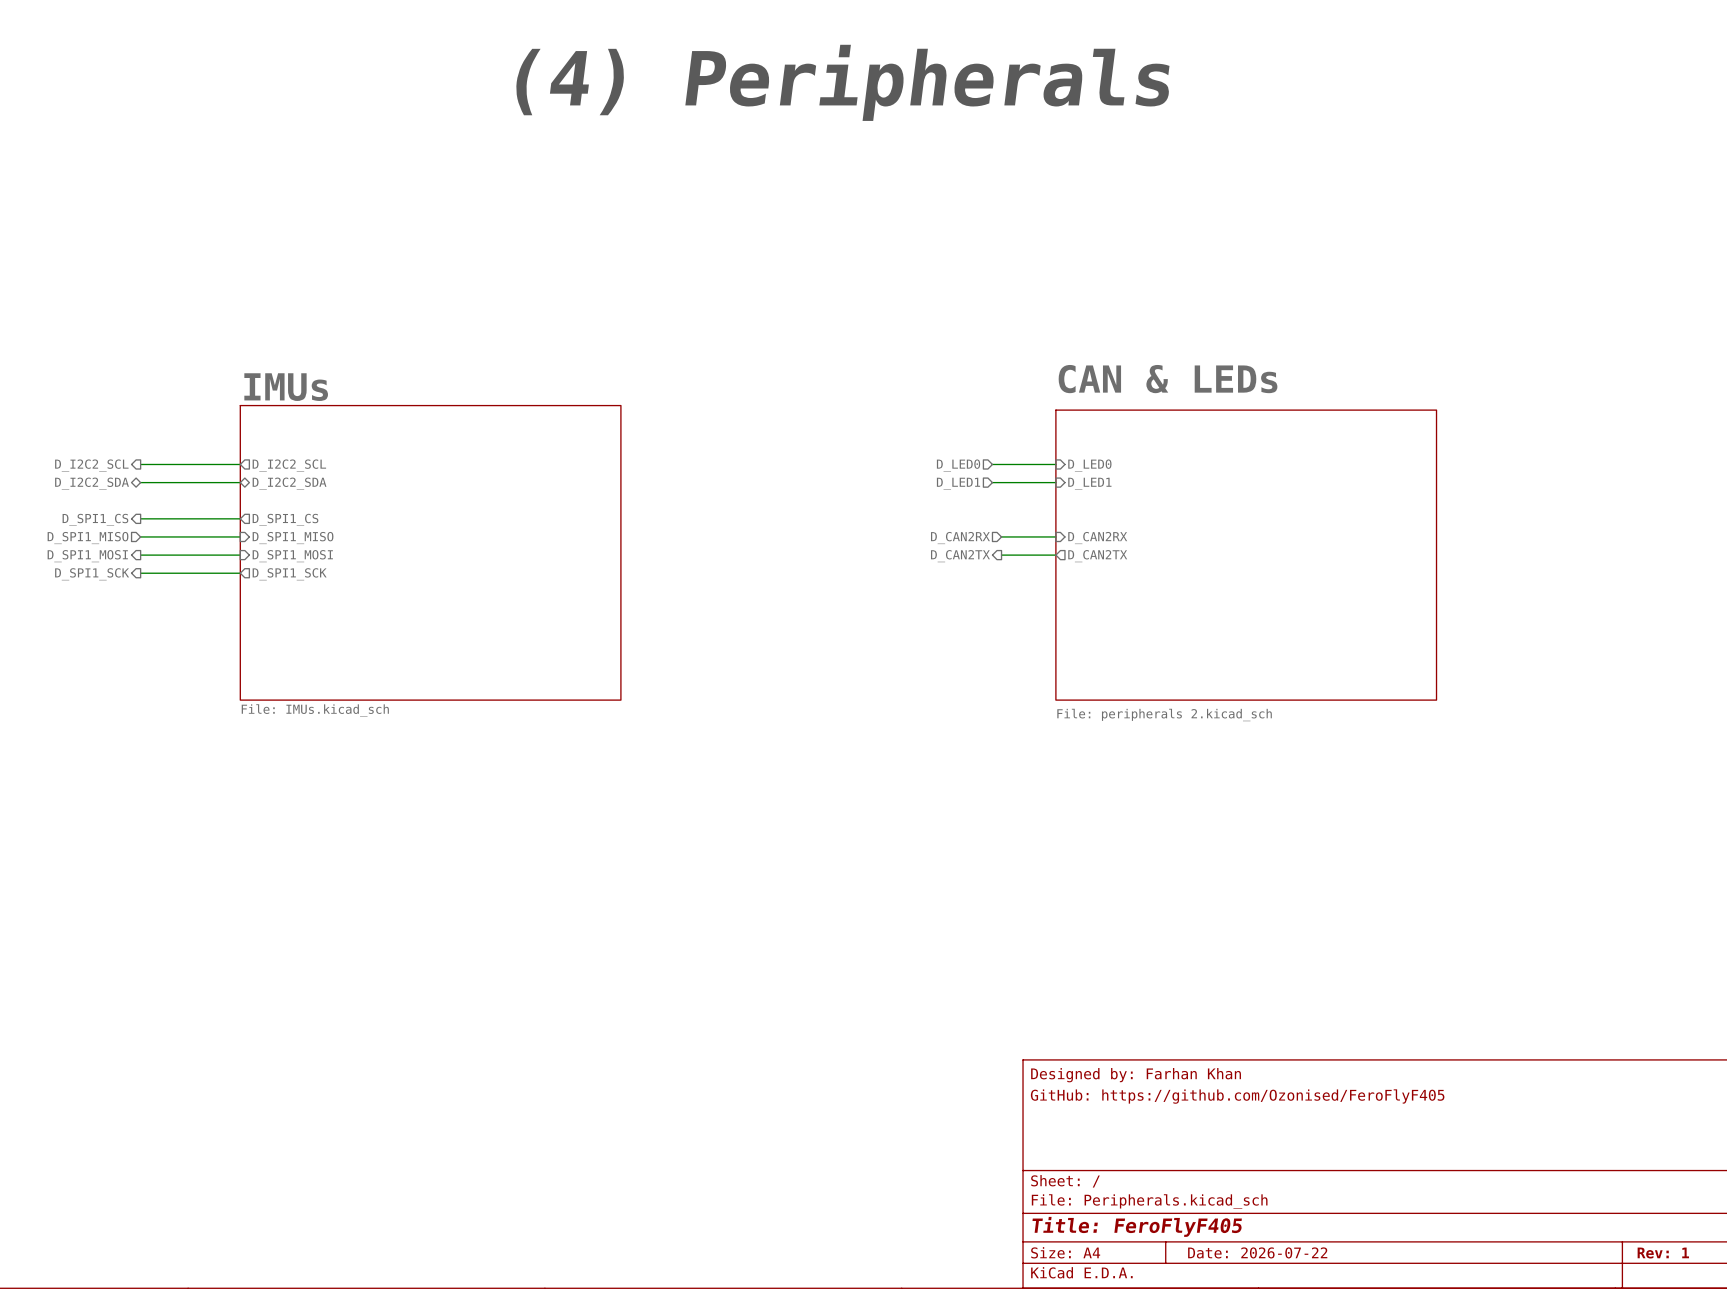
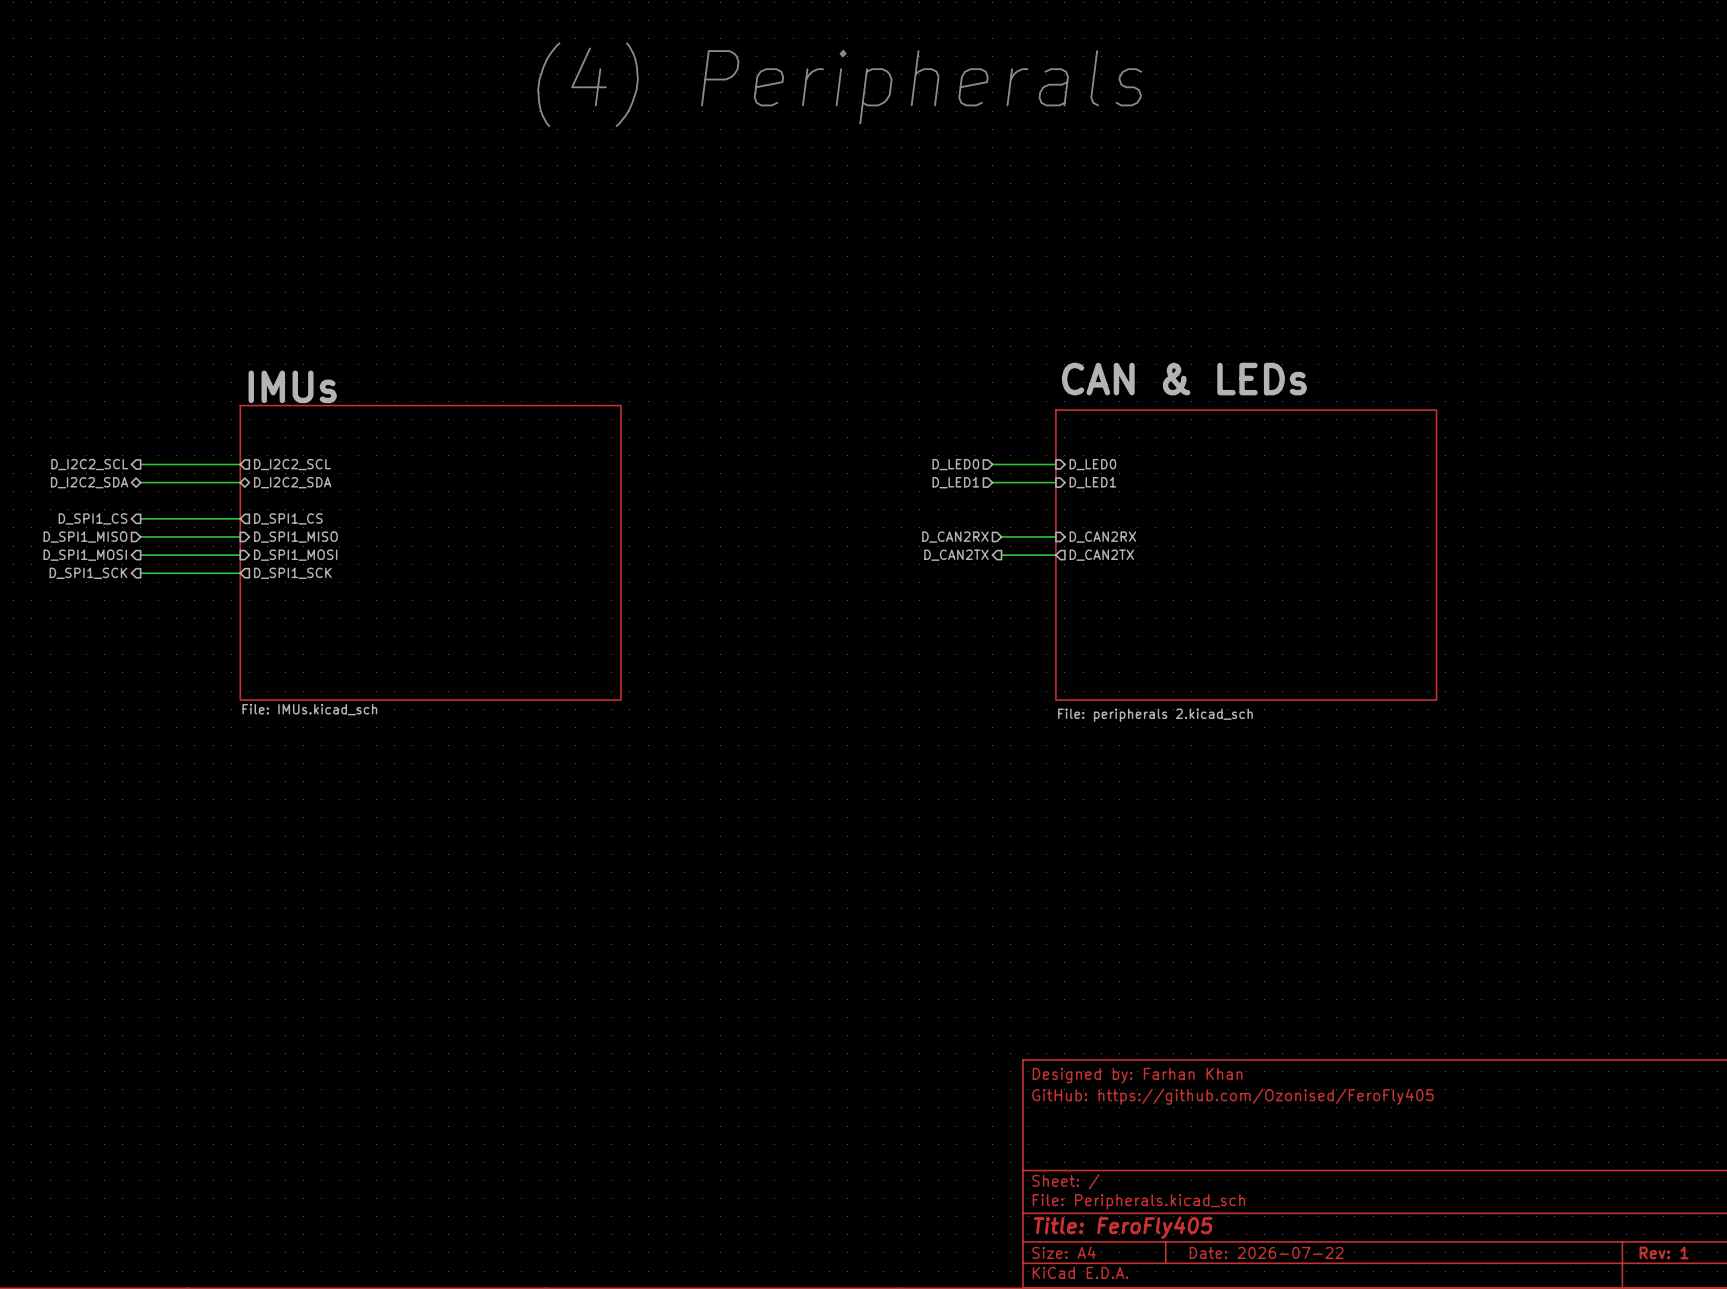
title block: GitHub: https://github.com/Ozonised/FeroFlyF405 (1237, 1096) -> GitHub: https://github.com/Ozonised/FeroFly405 (1232, 1096)
title block: Title: FeroFlyF405 (1137, 1226) -> Title: FeroFly405 (1123, 1227)

